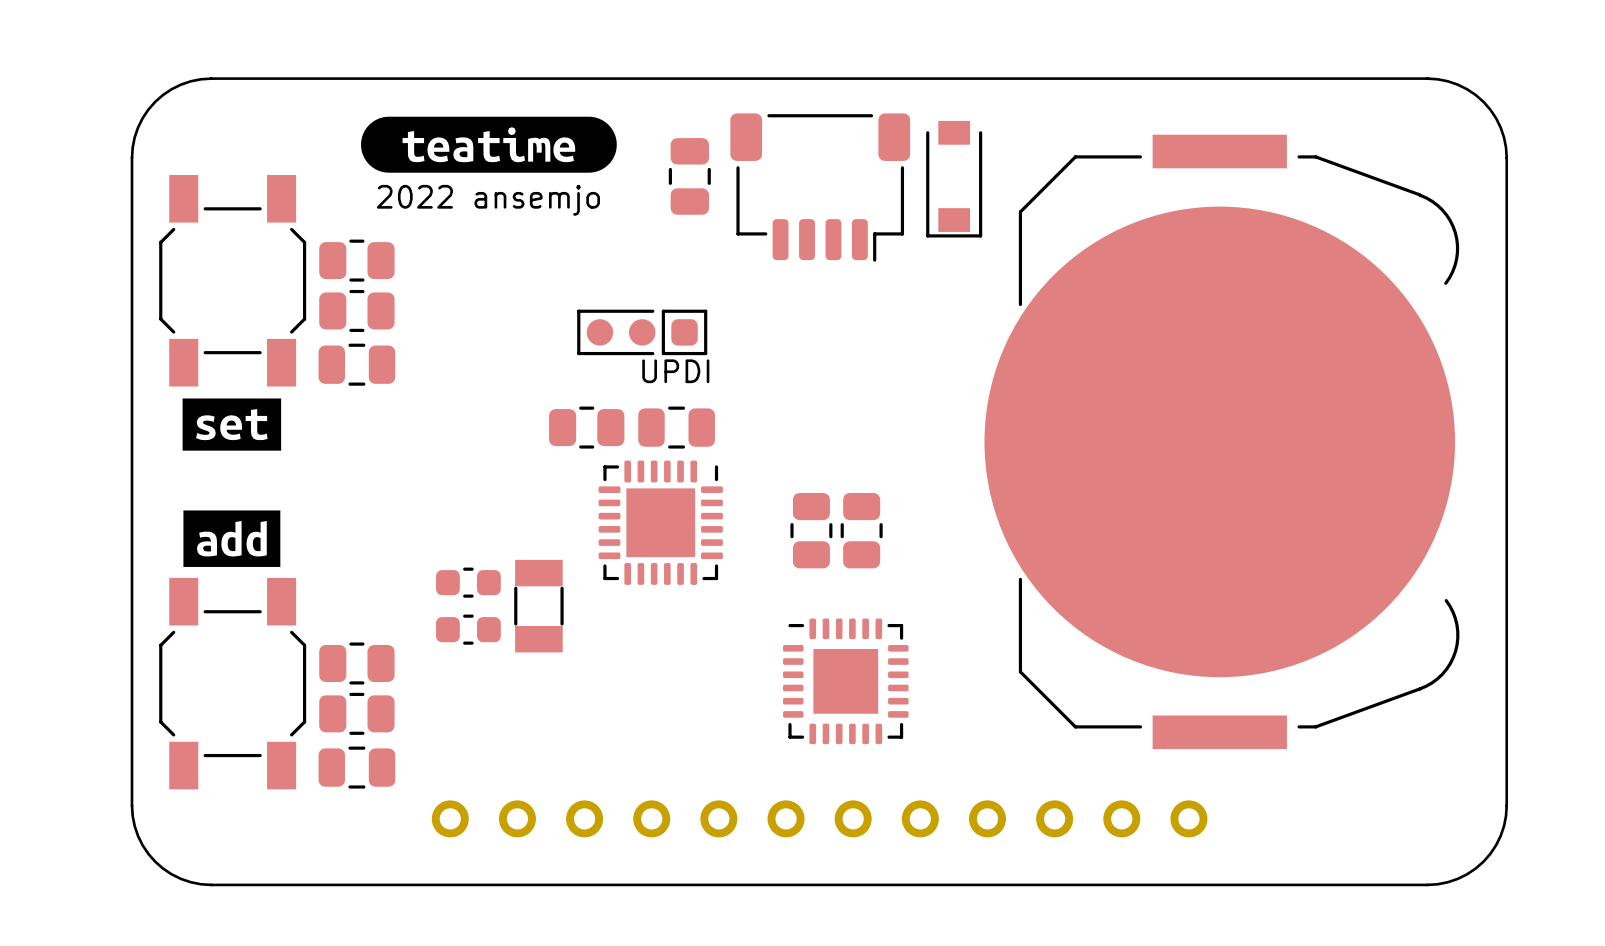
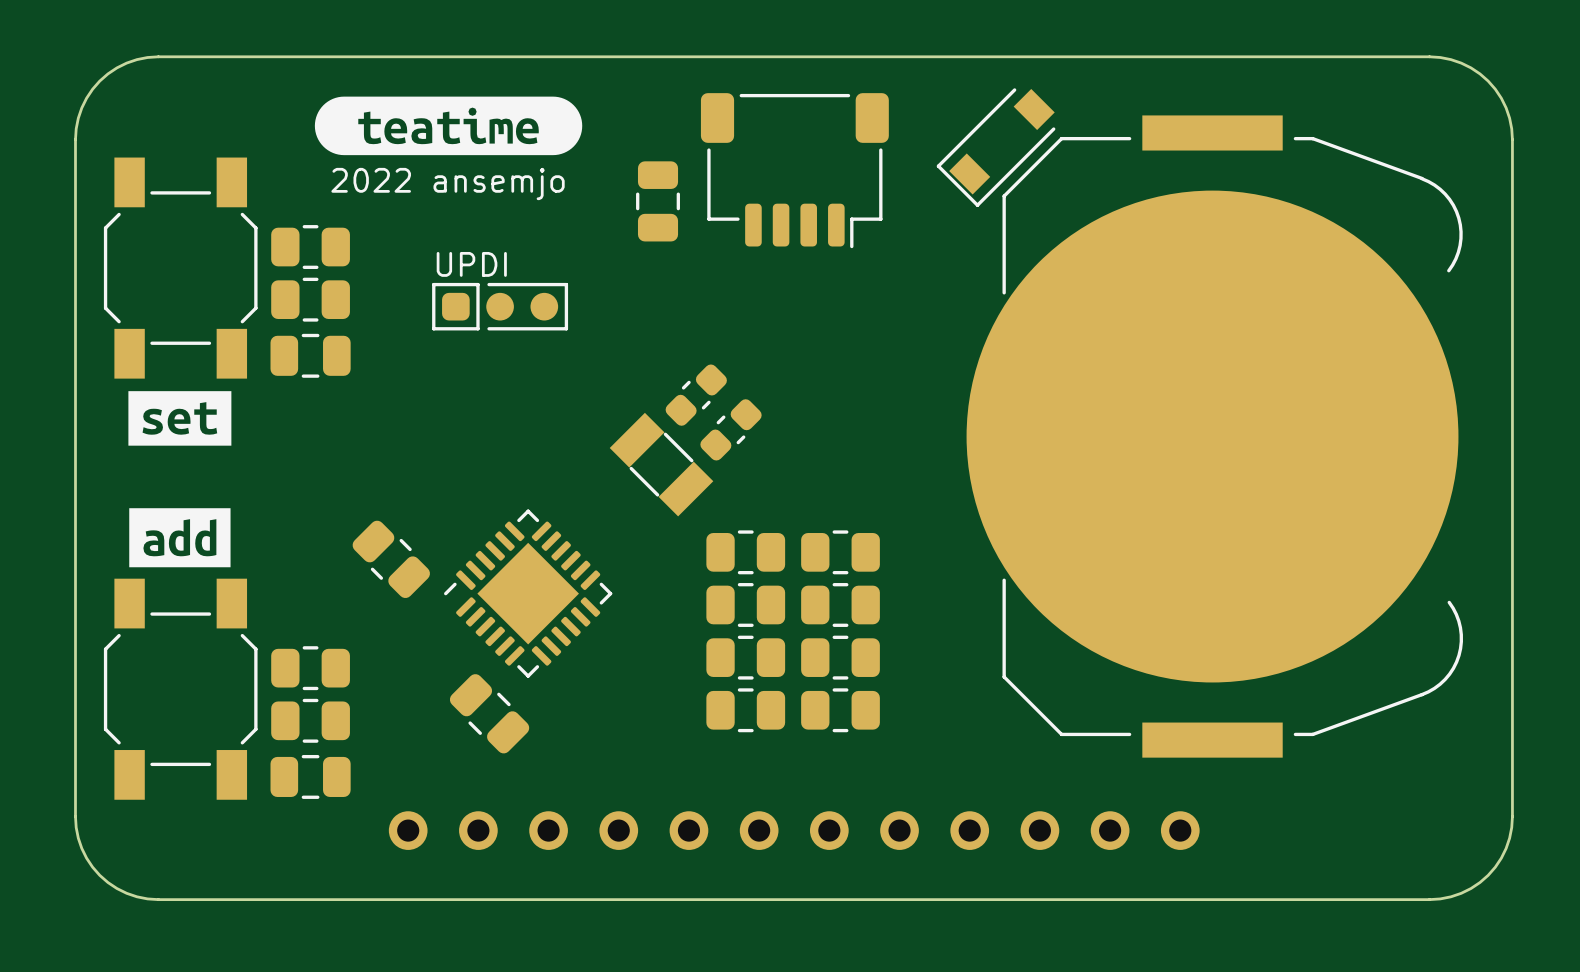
part: none -> (996, 147)
part position: (689, 176) -> (658, 201)
part: (954, 179) -> none
part: none -> (500, 306)
part: (642, 332) -> none
part: none -> (696, 395)
part: (586, 427) -> none
part: (676, 427) -> none
part: none -> (731, 429)
part: none -> (661, 464)
part: (660, 522) -> none
part: (811, 530) -> none
part rotation: 0° (861, 530) -> 90° clockwise (840, 552)
part: none -> (745, 552)
part: none -> (391, 559)
part: (468, 582) -> none
part: none -> (528, 593)
part: none -> (745, 604)
part: none -> (840, 604)
part: (538, 606) -> none
part: (468, 629) -> none
part: none -> (745, 657)
part: none -> (840, 657)
part: (845, 681) -> none
part: none -> (745, 710)
part: none -> (840, 710)
part: none -> (489, 713)

